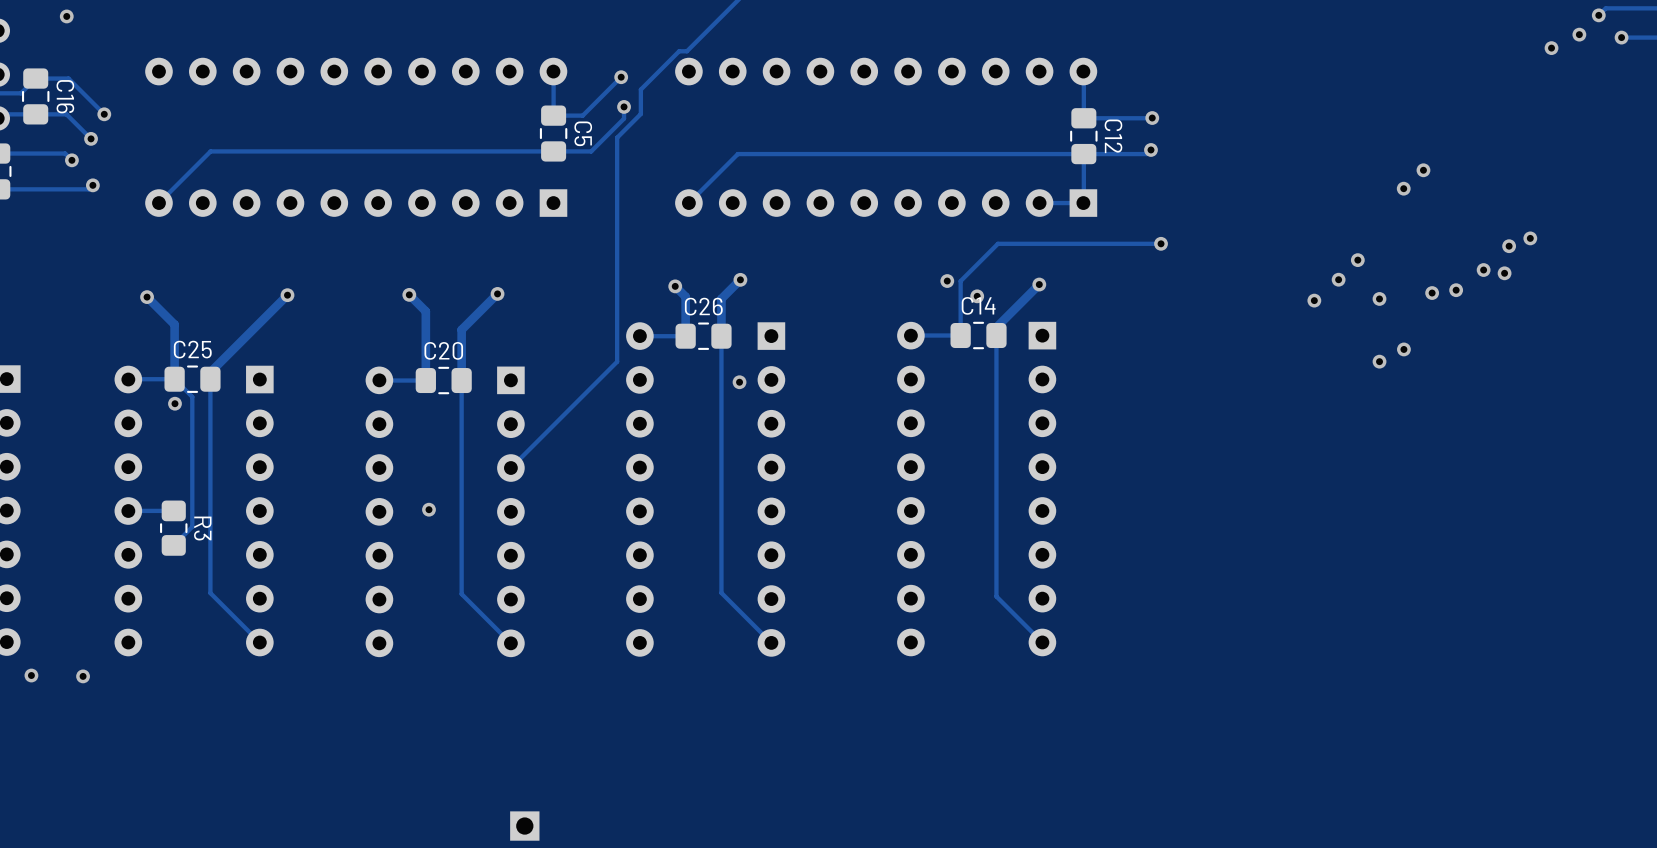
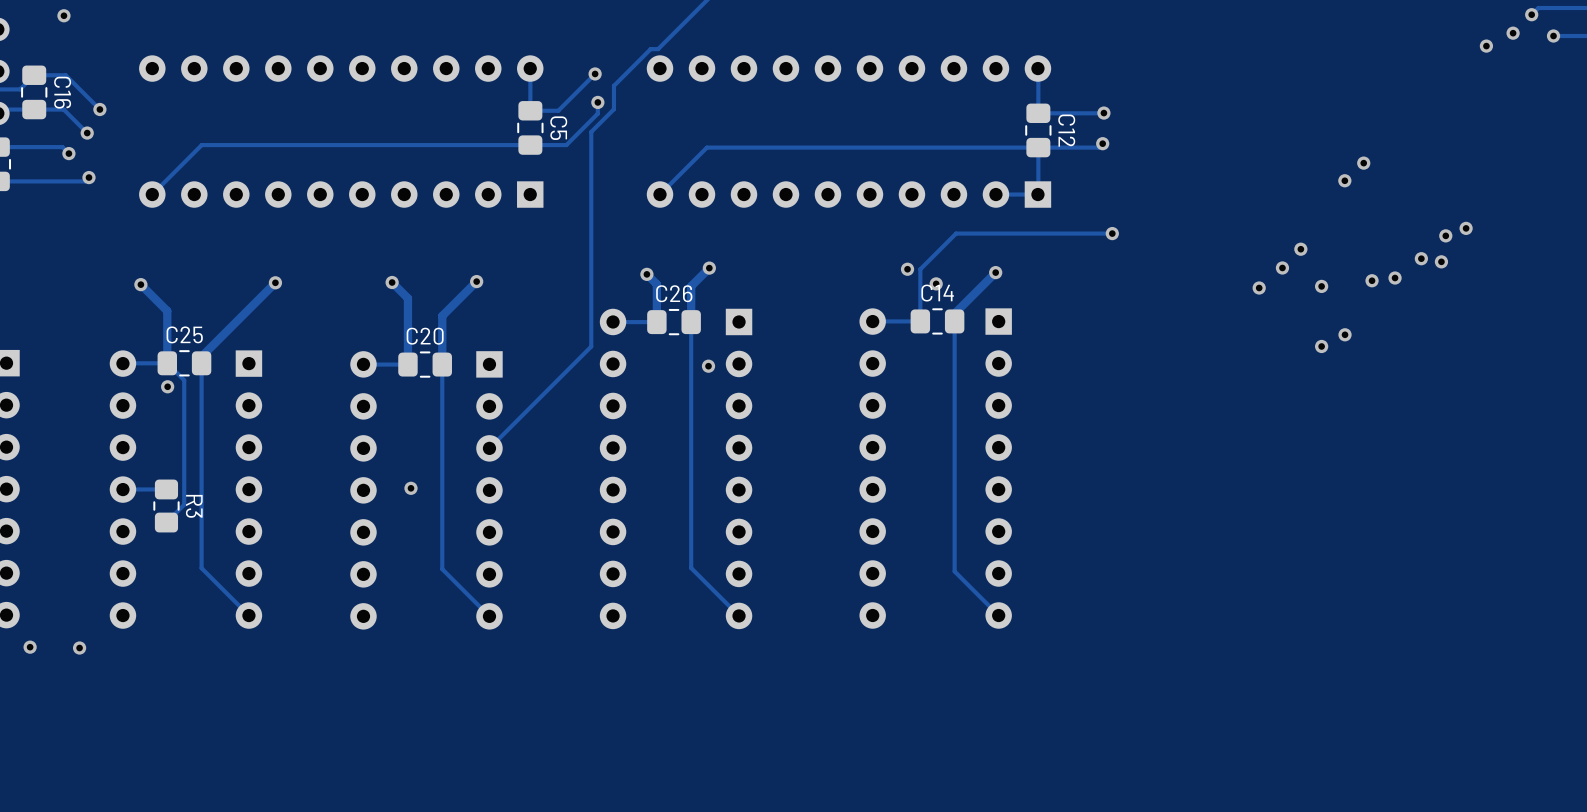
part: (524, 826) -> none

